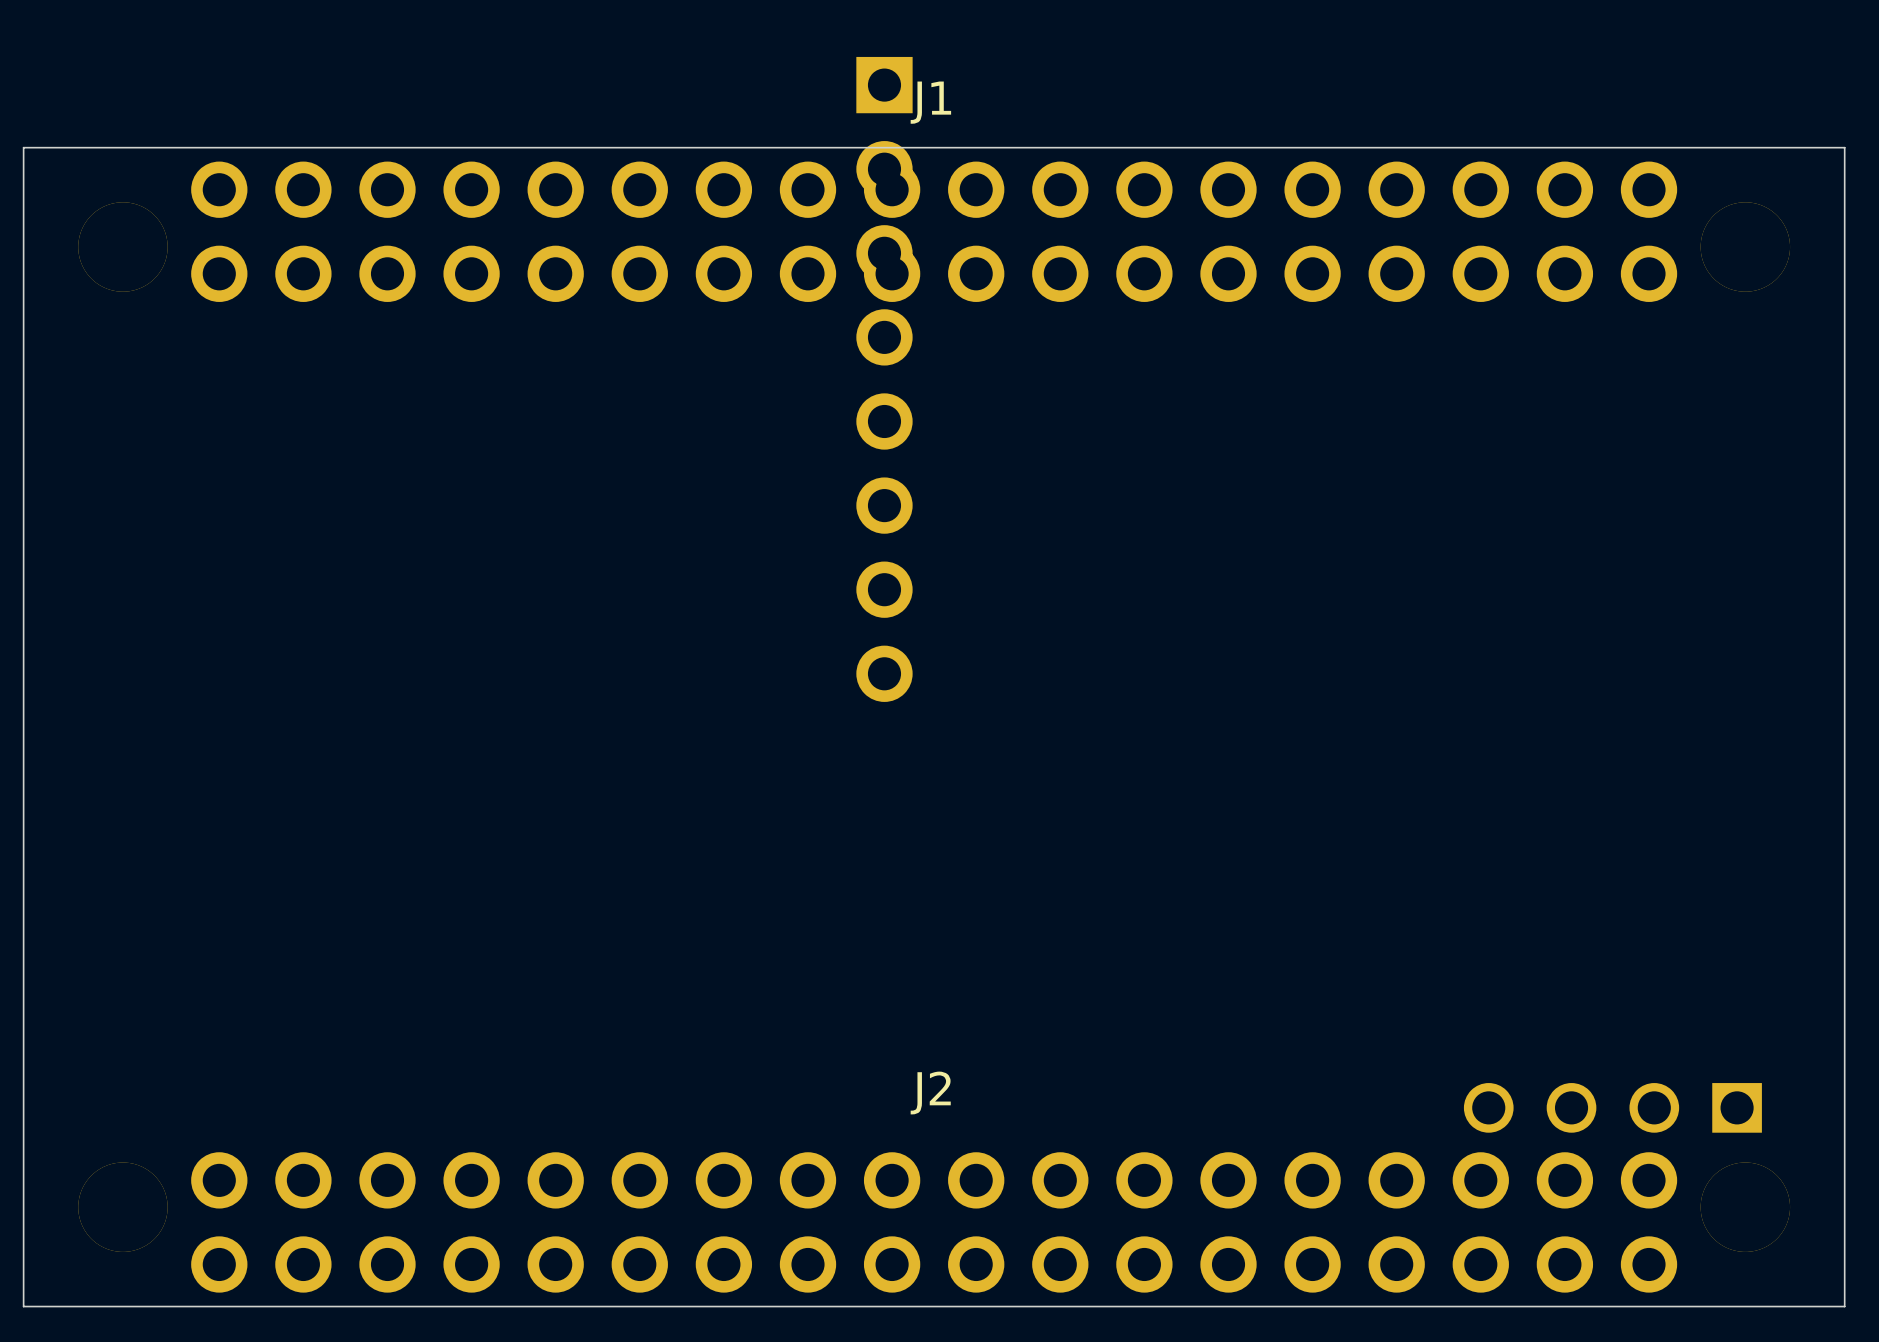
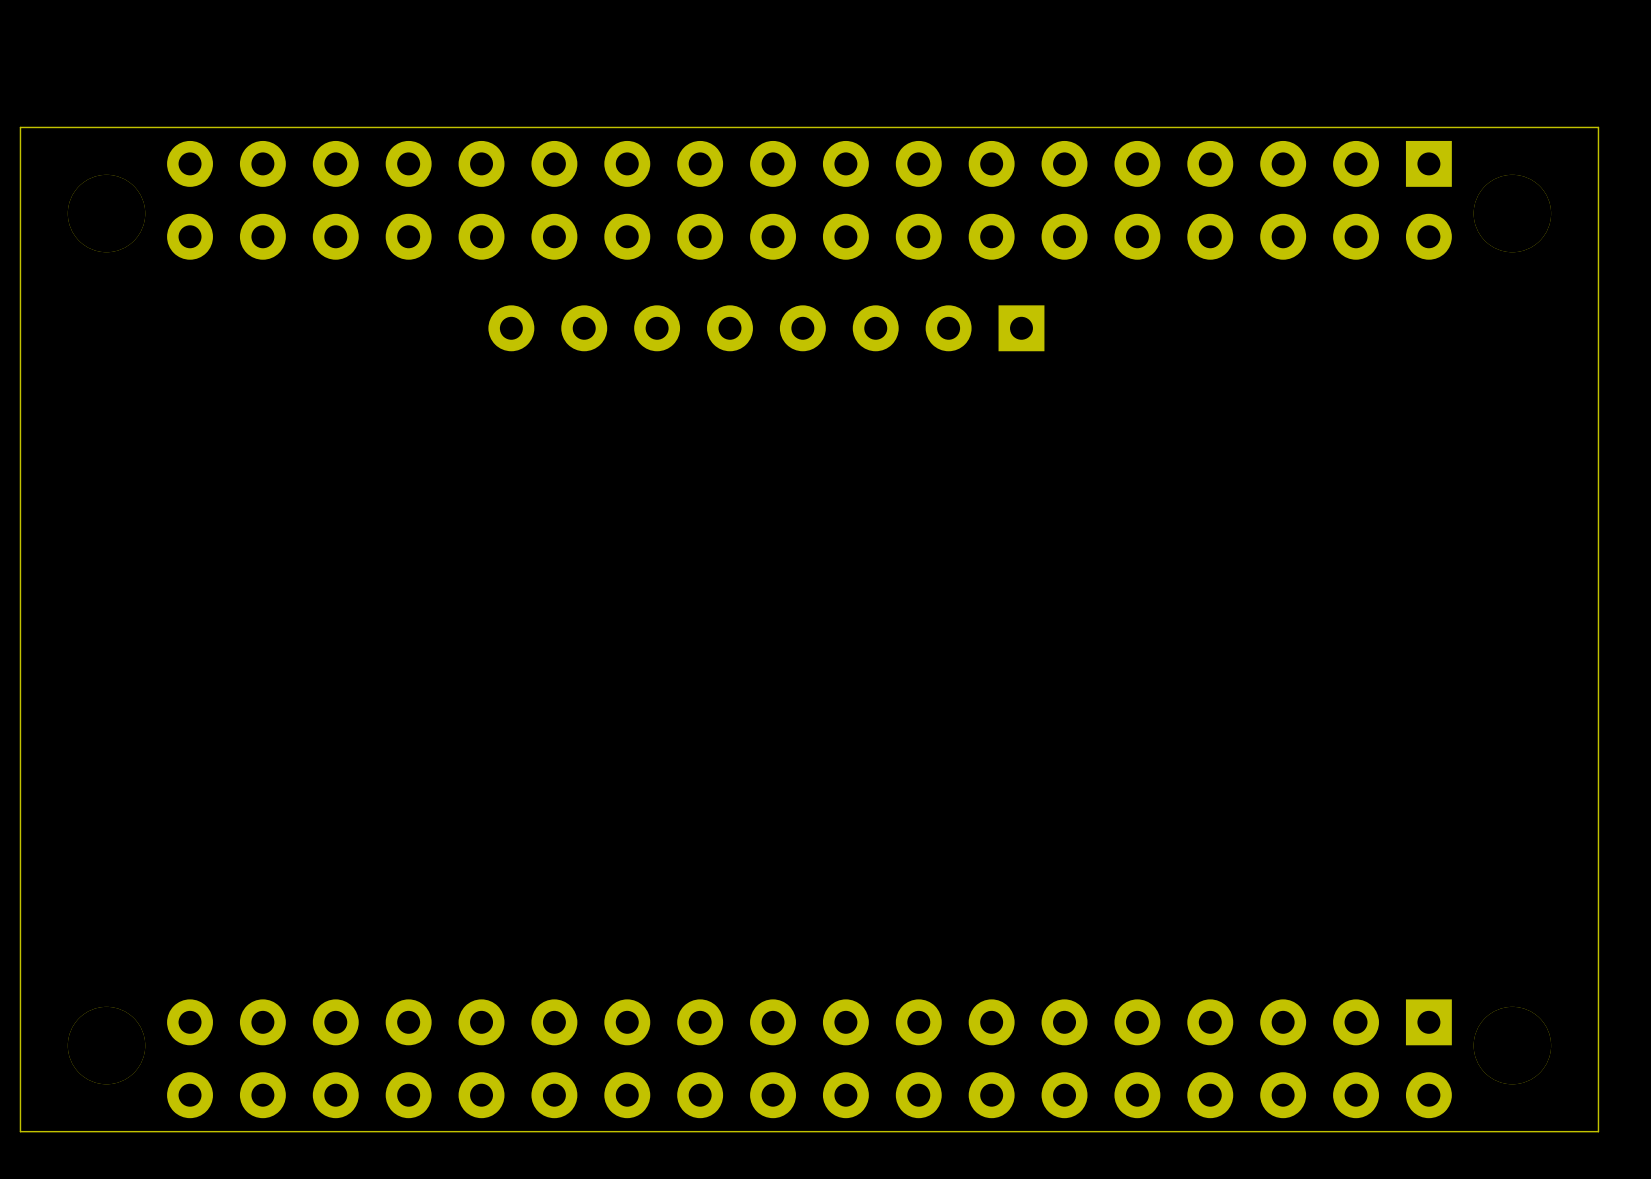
part footprint: [856, 56, 913, 702] -> [488, 305, 1045, 352]
J1: (934, 231) -> none
part: none -> (809, 200)
part: (1612, 1107) -> none
J2: (934, 1222) -> none
part: none -> (809, 1058)

